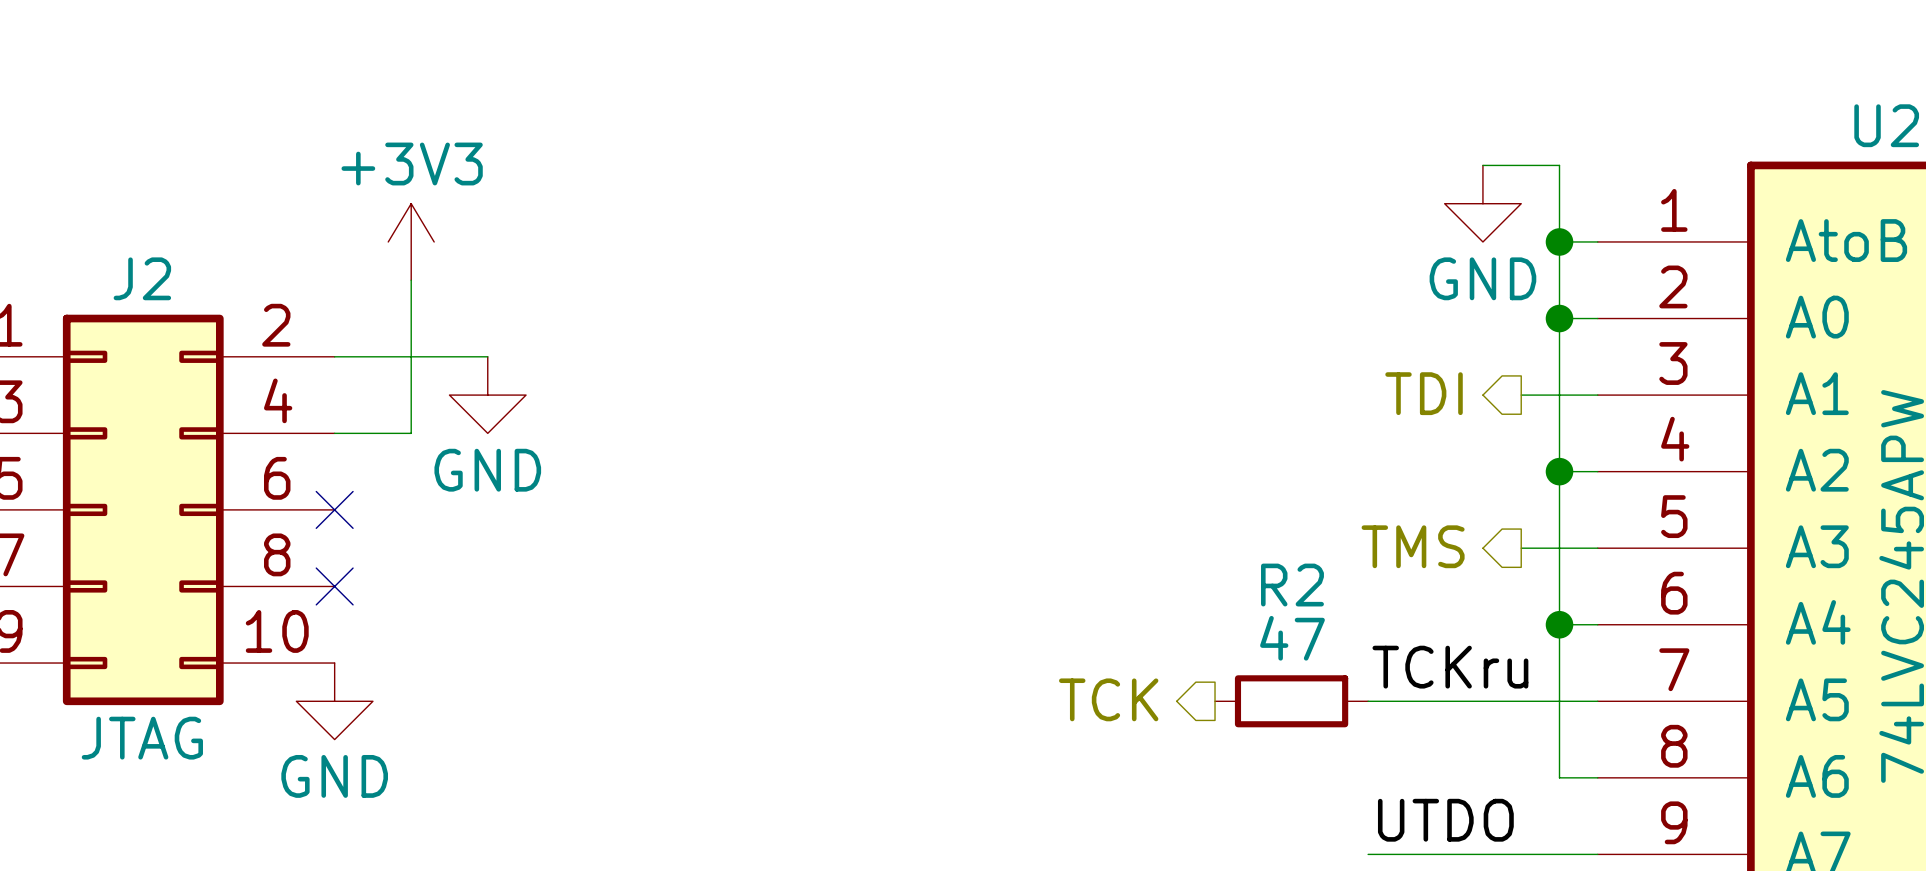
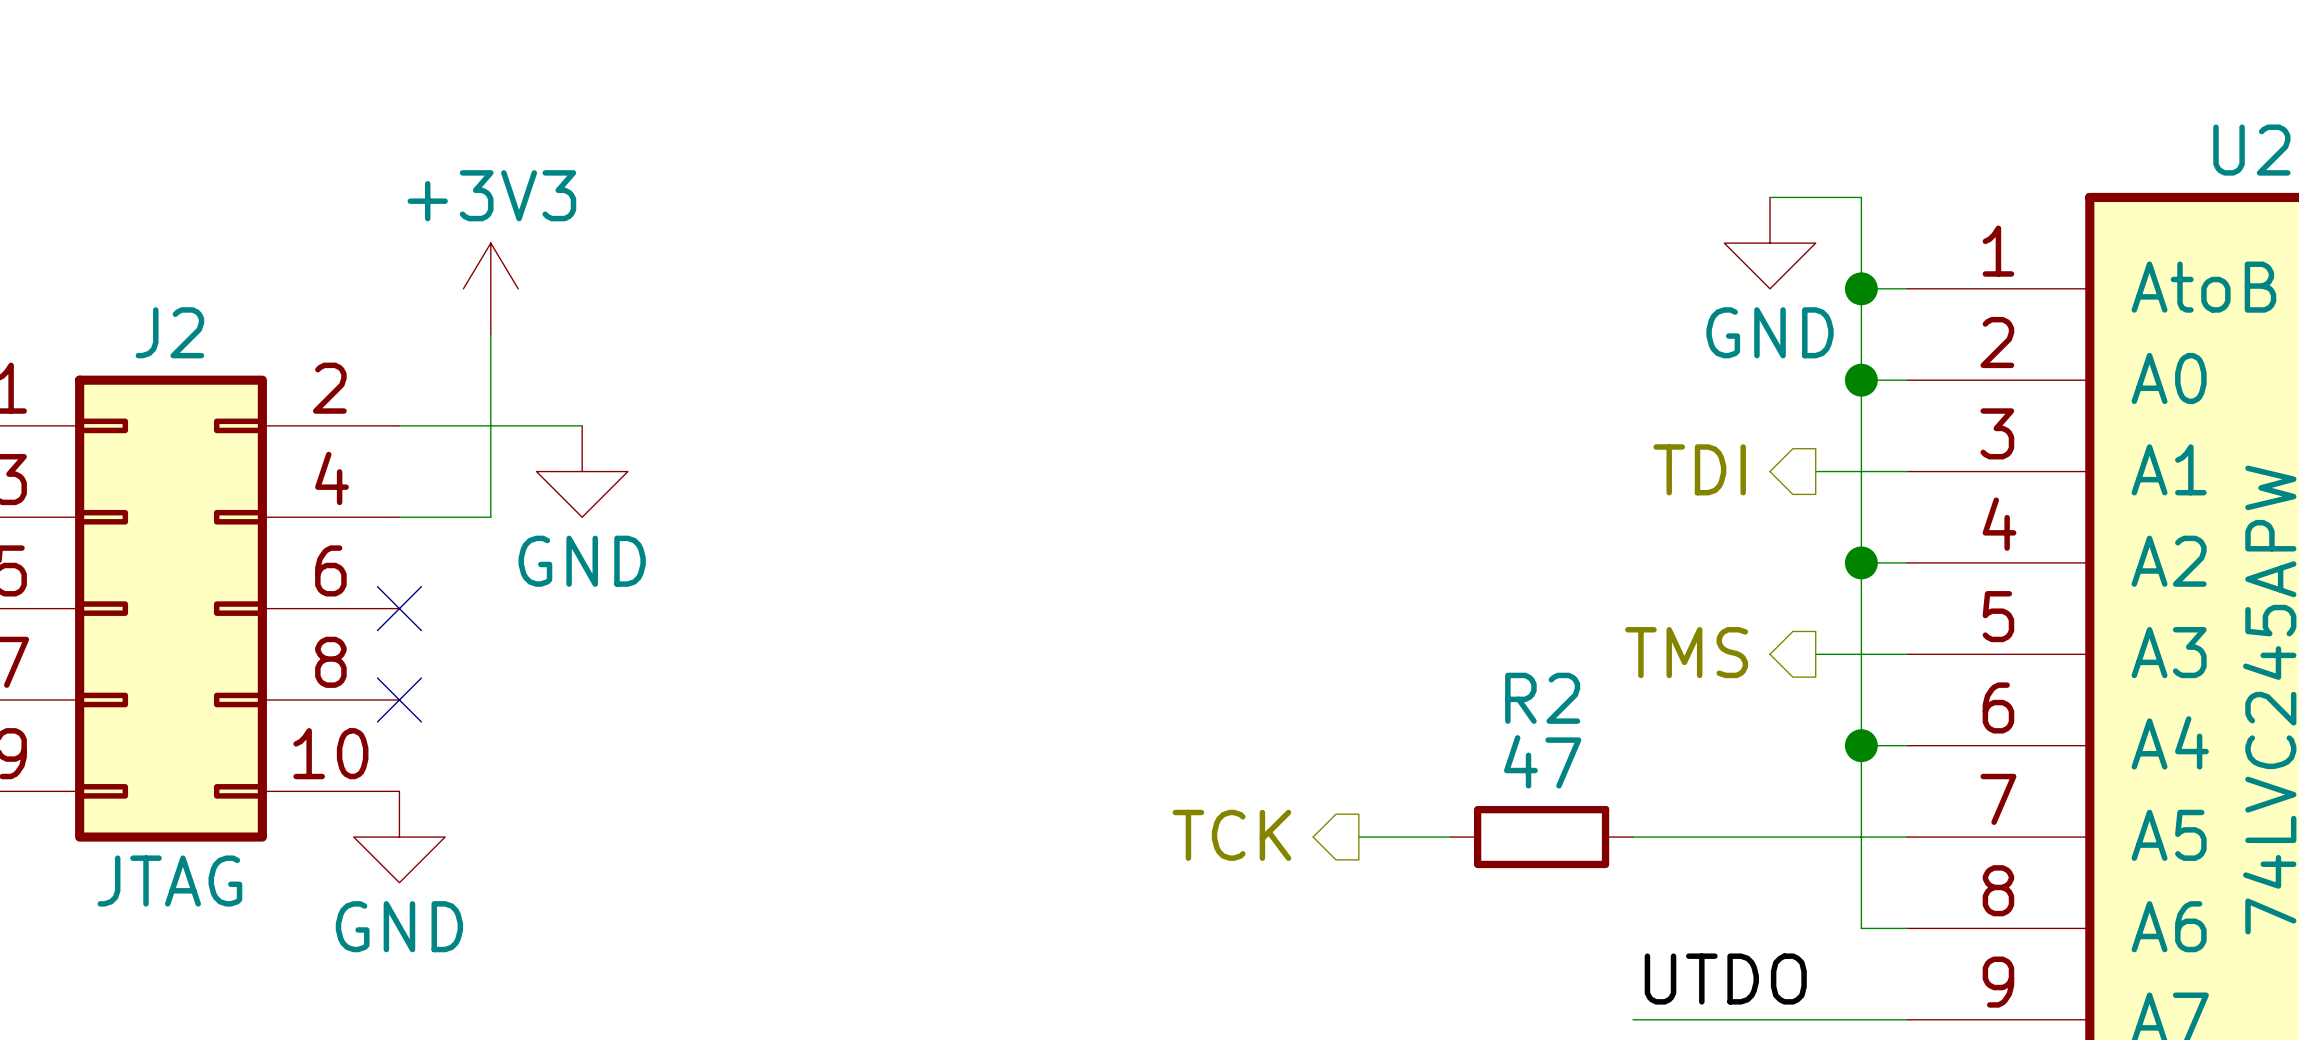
label: TCKru (1450, 667) -> none
hierarchical label position: TCK (1108, 699) -> TCK (1231, 835)
wire: none -> (1358, 837) (1450, 837)

